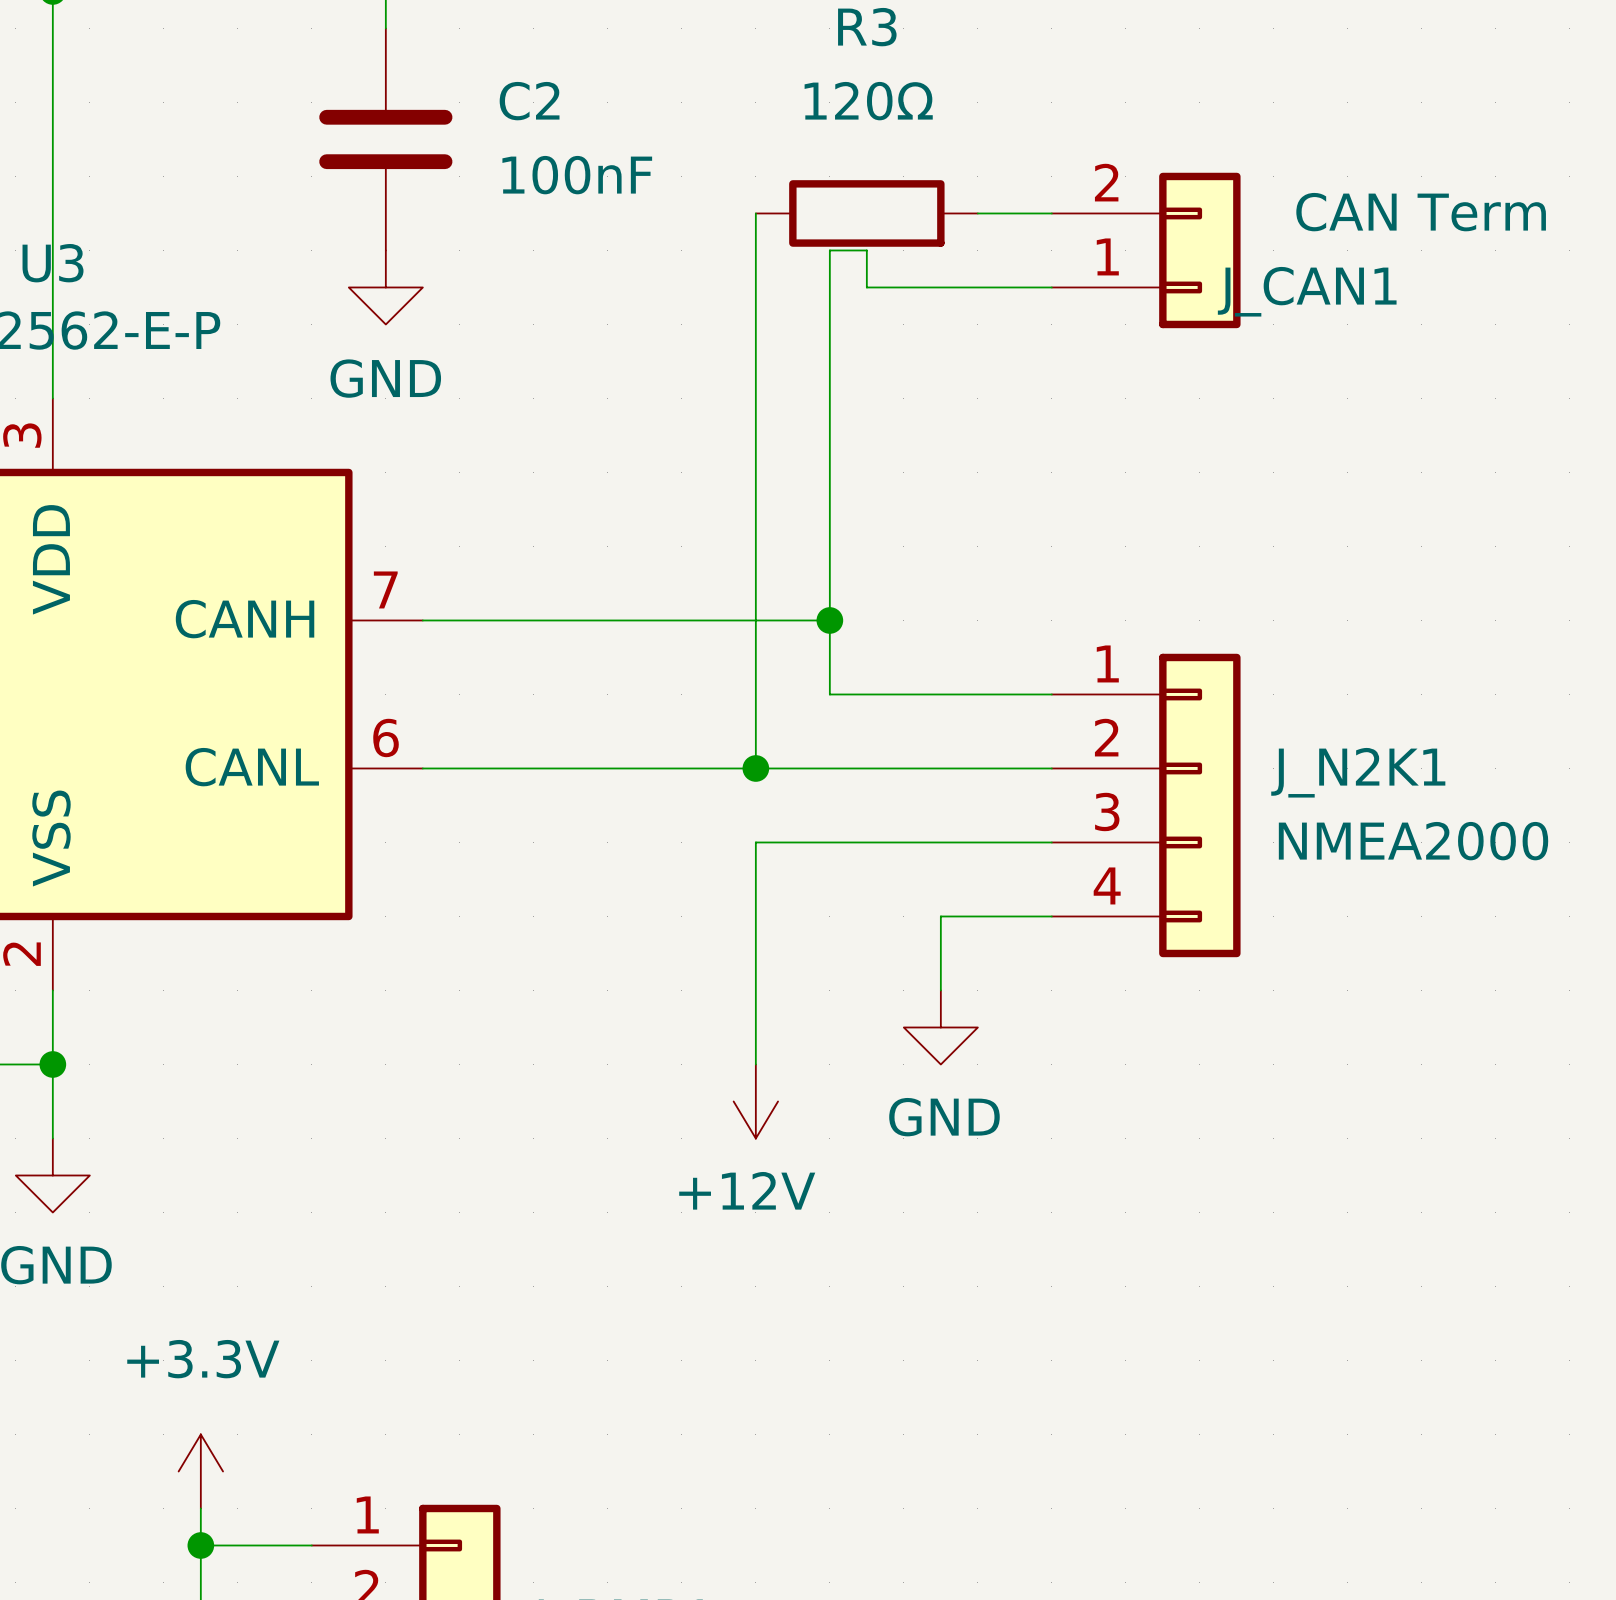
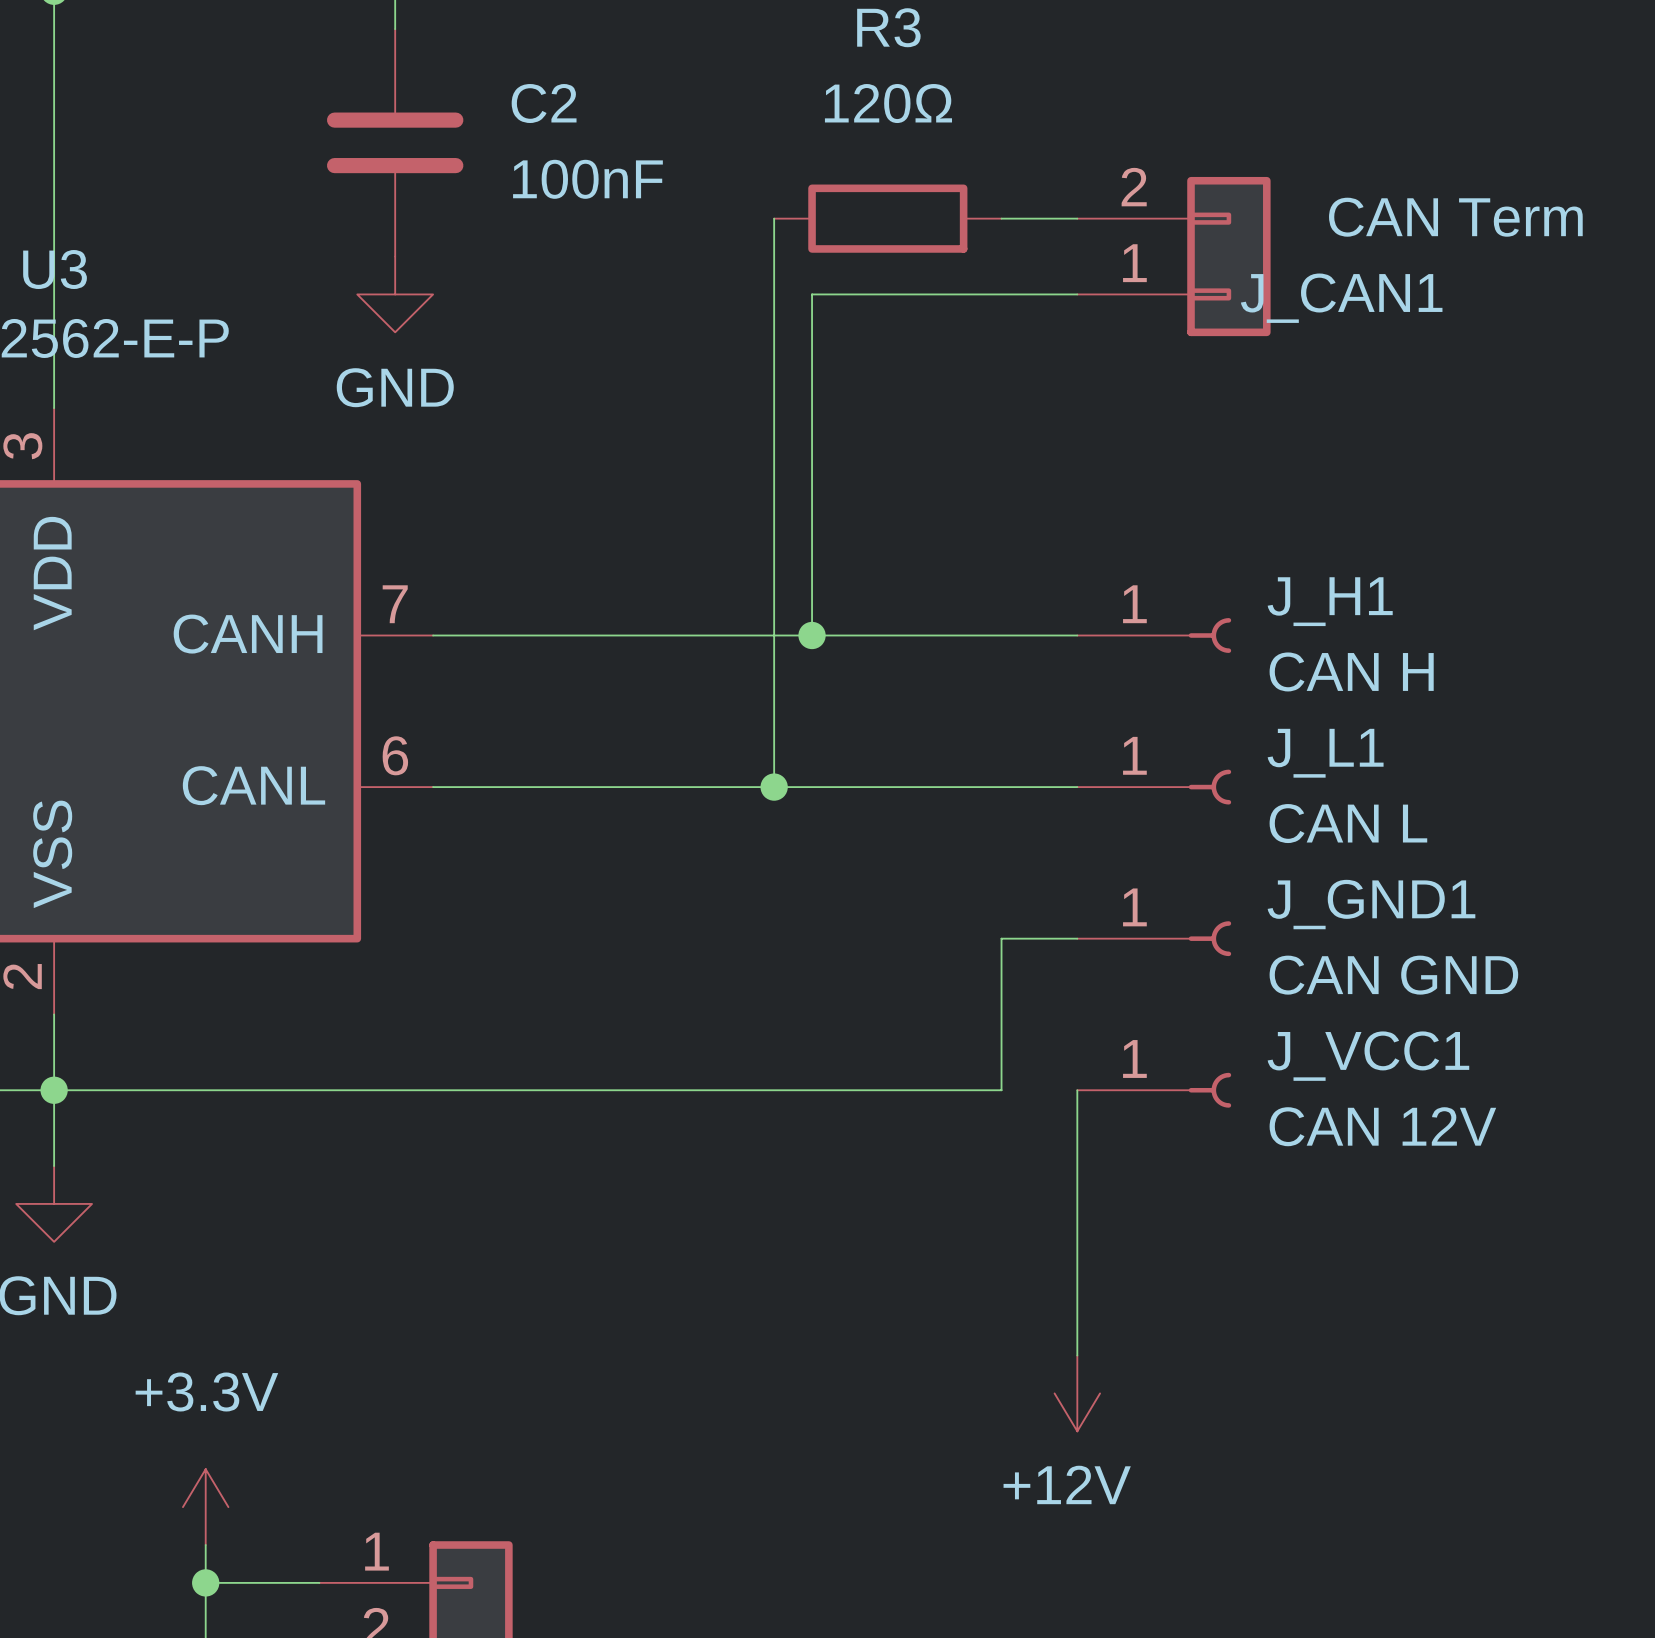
wire: (866, 287) (866, 250) (829, 250) (829, 694) (1051, 694) -> (887, 294) (812, 294) (812, 635)
wire: none -> (849, 635) (1077, 635)
junction position: (829, 620) -> (812, 635)
J_H1: none -> CAN H (1154, 635)
J_L1: none -> CAN L (1154, 787)
J_N2K1: NMEA2000 (1146, 805) -> none
wire: (1051, 842) (755, 842) (755, 1064) -> none
wire: (977, 916) (940, 916) (940, 990) -> (1001, 938) (1001, 1090) (54, 1090)
J_GND1: none -> CAN GND (1154, 938)
power symbol: GND (940, 1027) -> none
wire: none -> (1077, 1090) (1077, 1355)
J_VCC1: none -> CAN 12V (1154, 1090)
power symbol position: +12V (755, 1101) -> +12V (1077, 1393)

